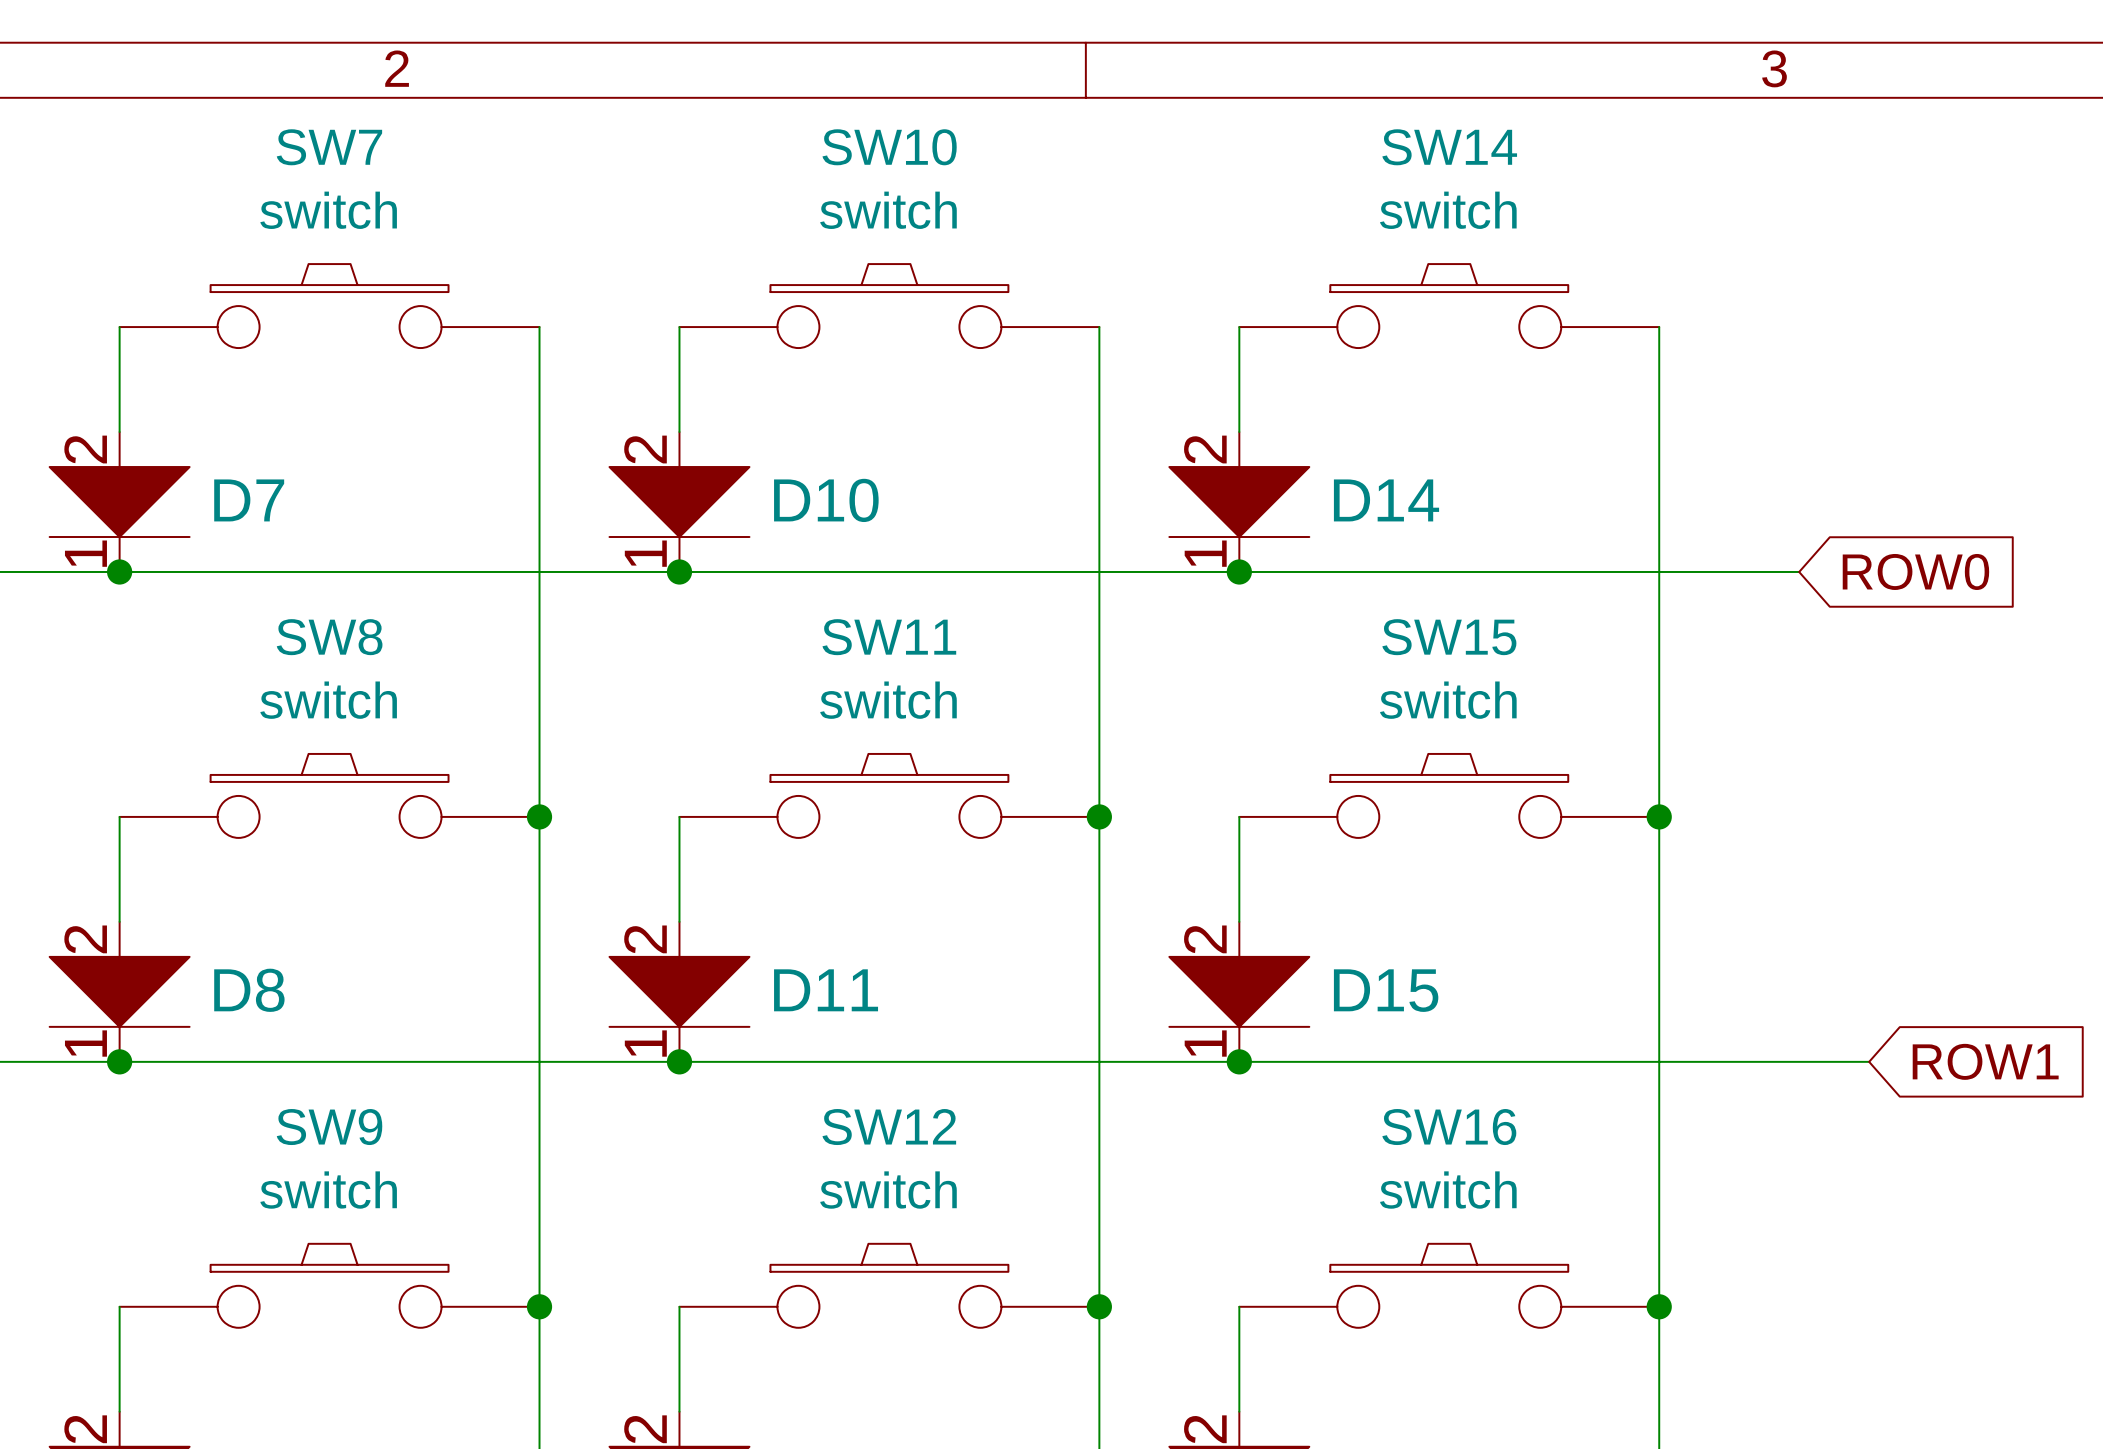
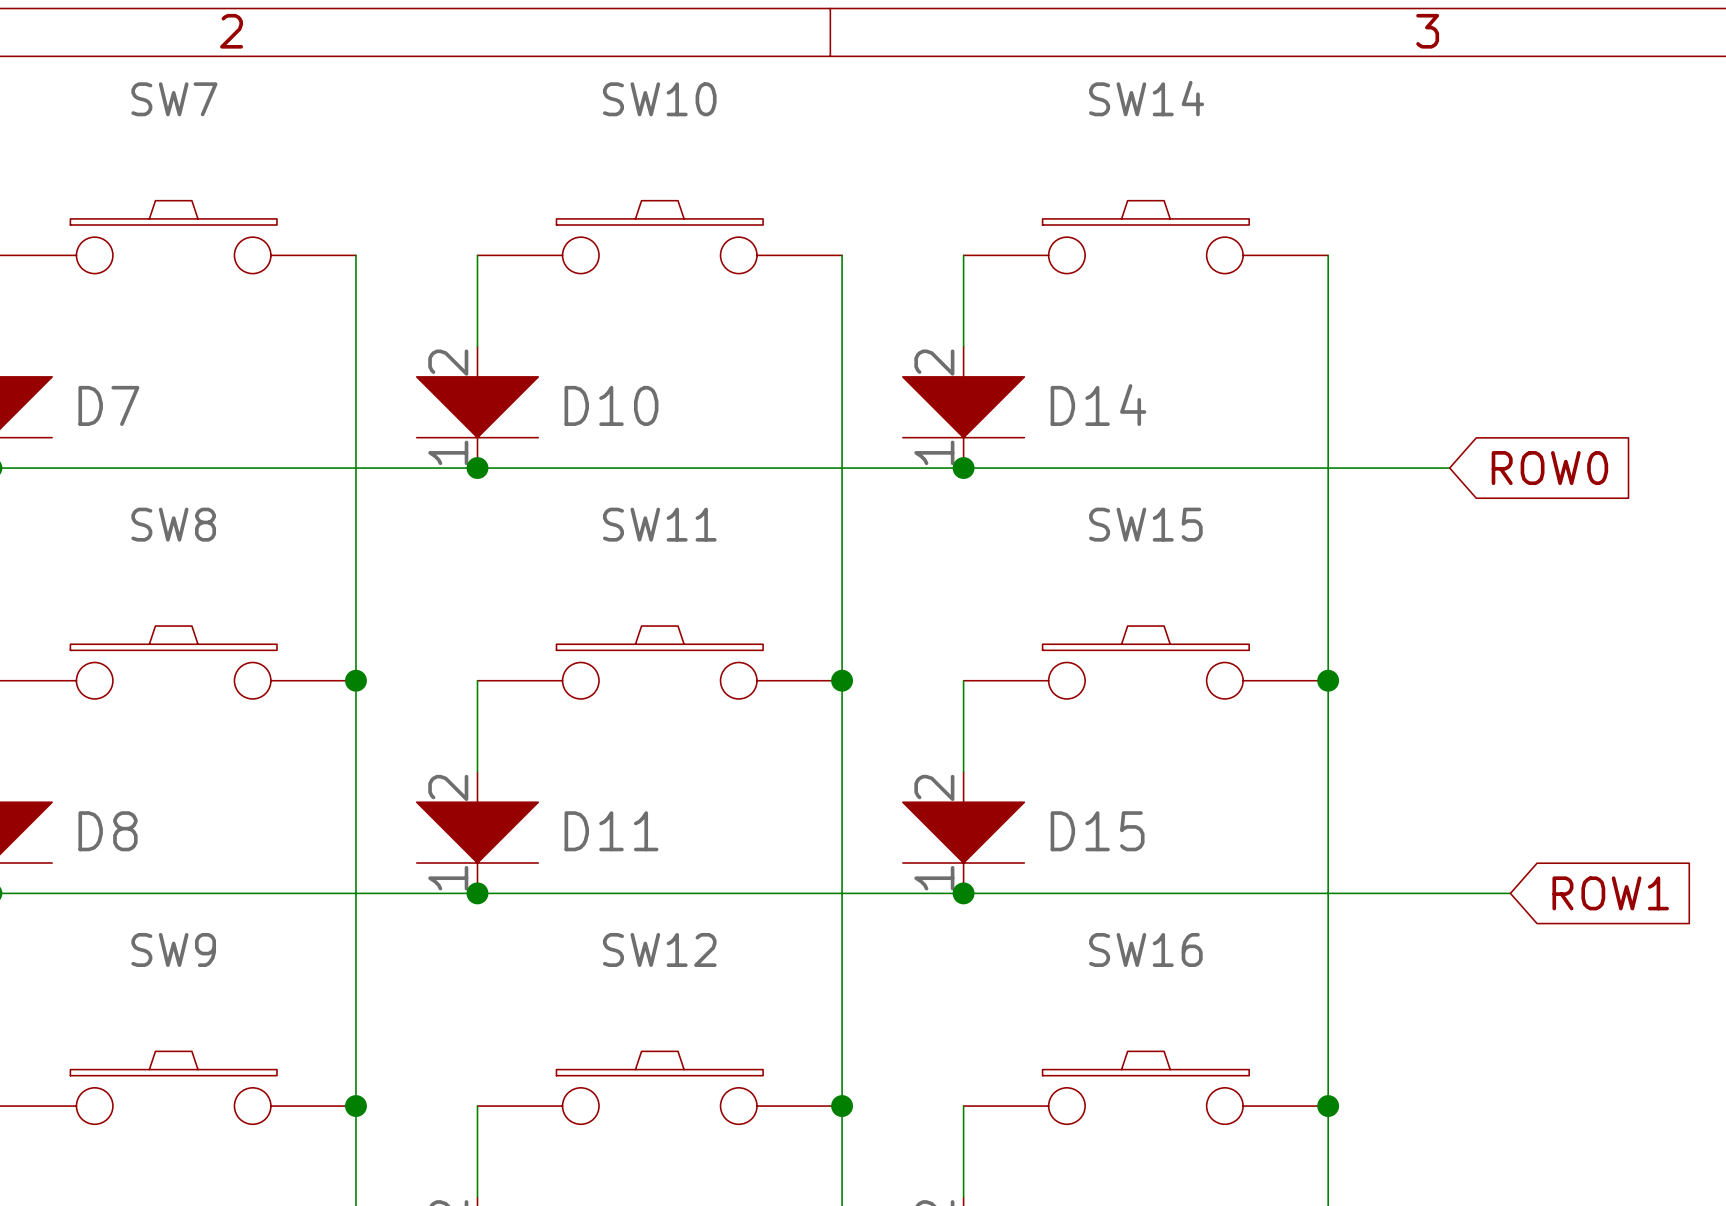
SW7 value: switch (328, 210) -> none
SW10 value: switch (888, 210) -> none
SW14 value: switch (1448, 210) -> none
SW8 value: switch (328, 700) -> none
SW11 value: switch (888, 700) -> none
SW15 value: switch (1448, 700) -> none
SW9 value: switch (328, 1190) -> none
SW12 value: switch (888, 1190) -> none
SW16 value: switch (1448, 1190) -> none

